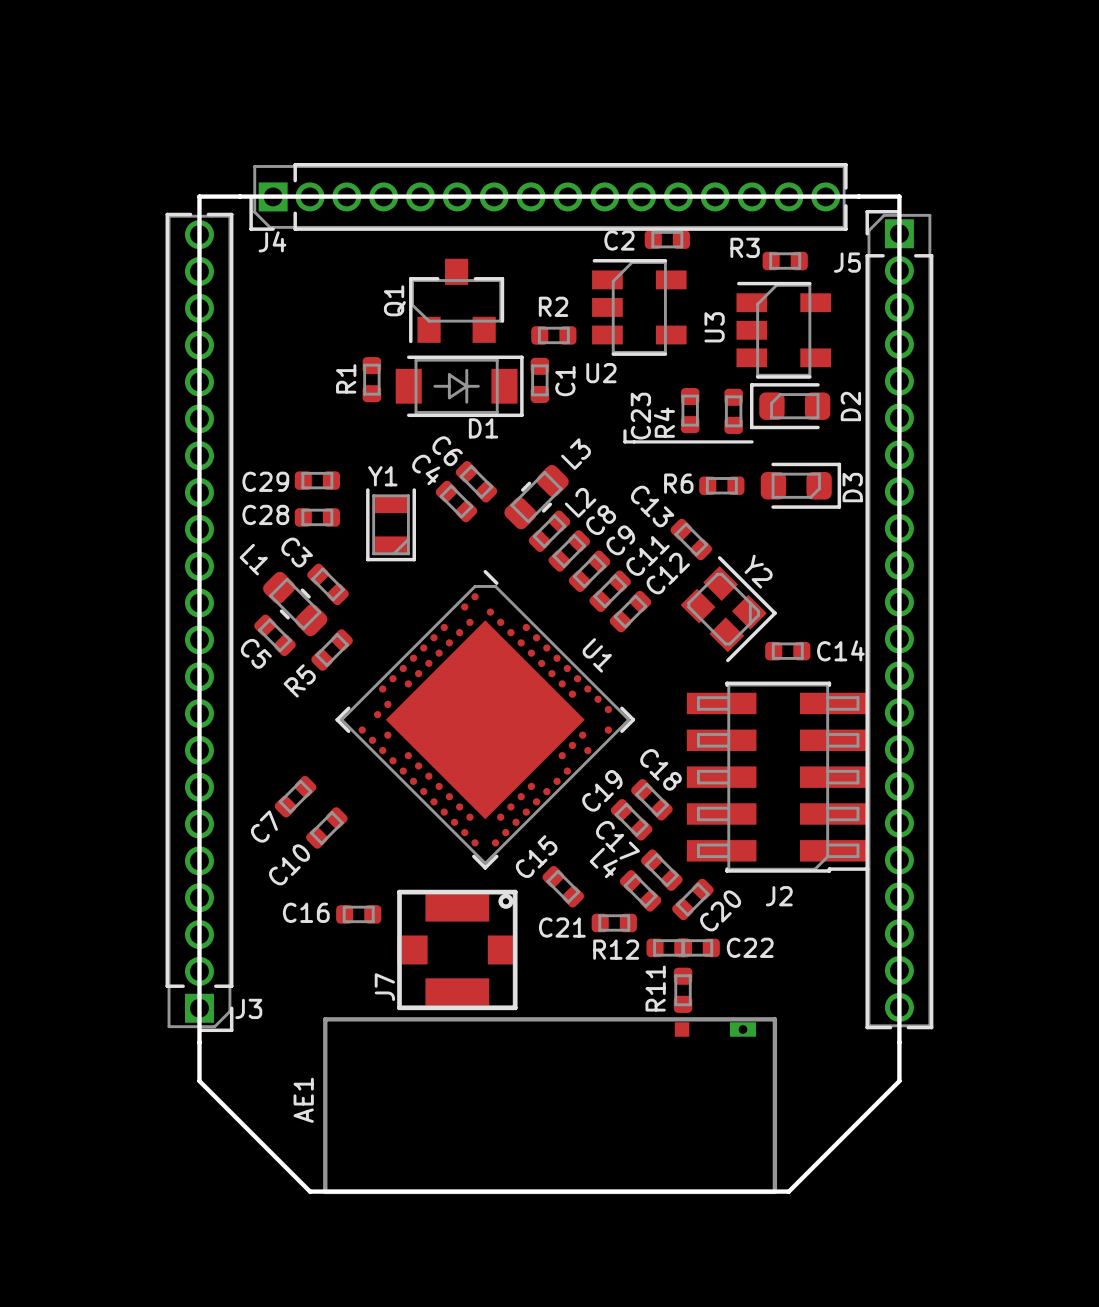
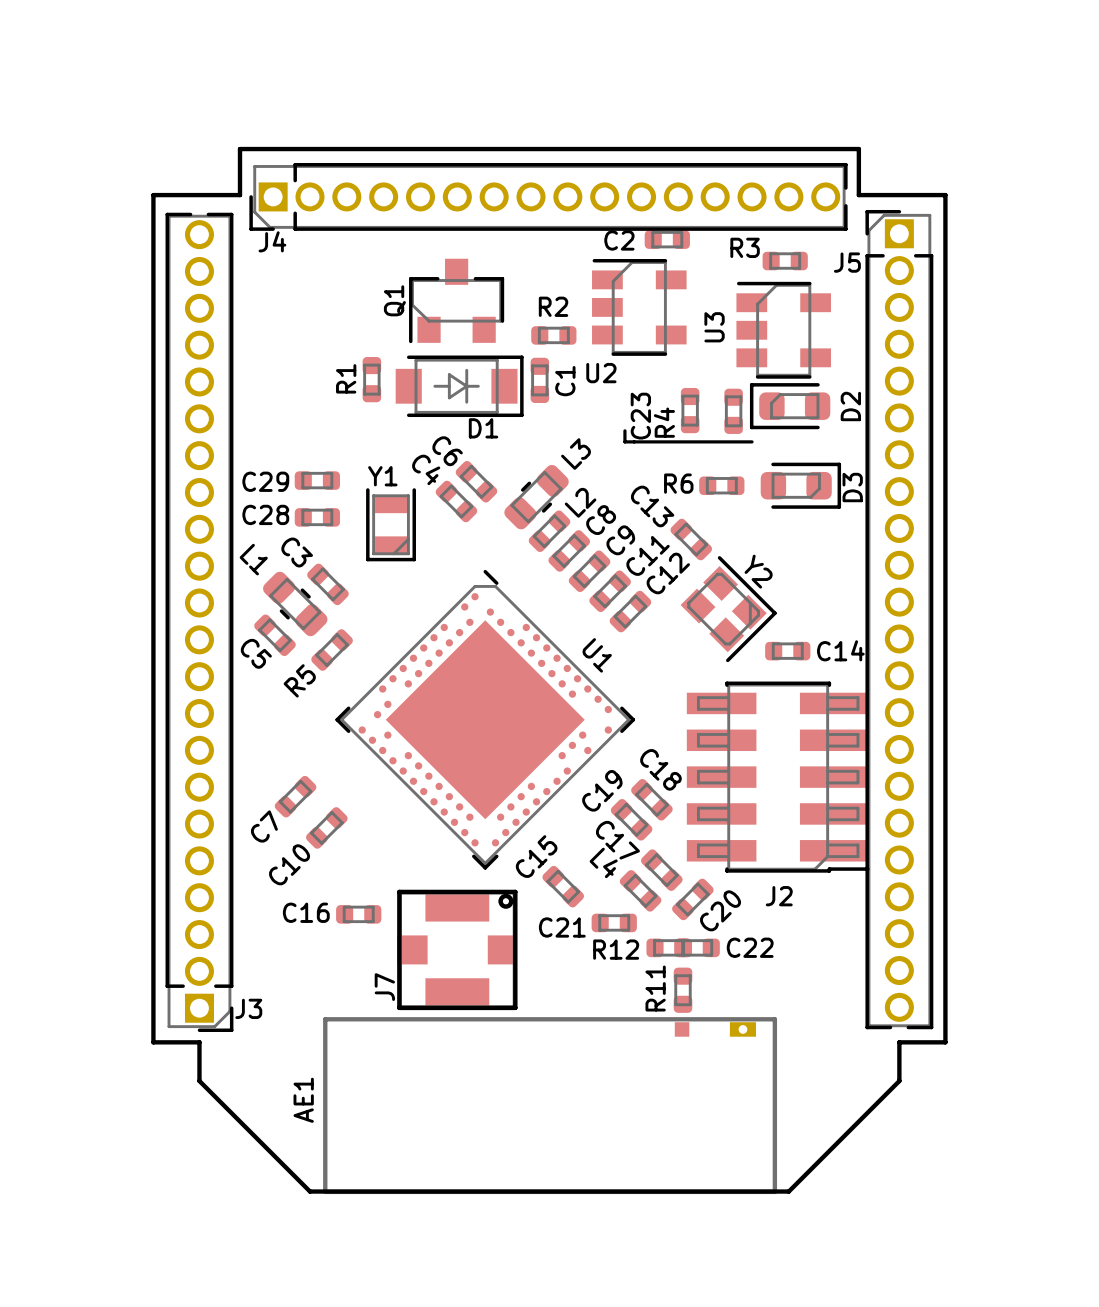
board edge: (199, 1042) (199, 196) (899, 196) (899, 1042) -> (199, 1042) (153, 1042) (153, 195) (239, 195) (239, 149) (858, 149) (858, 195) (945, 195) (945, 1042) (899, 1042)

